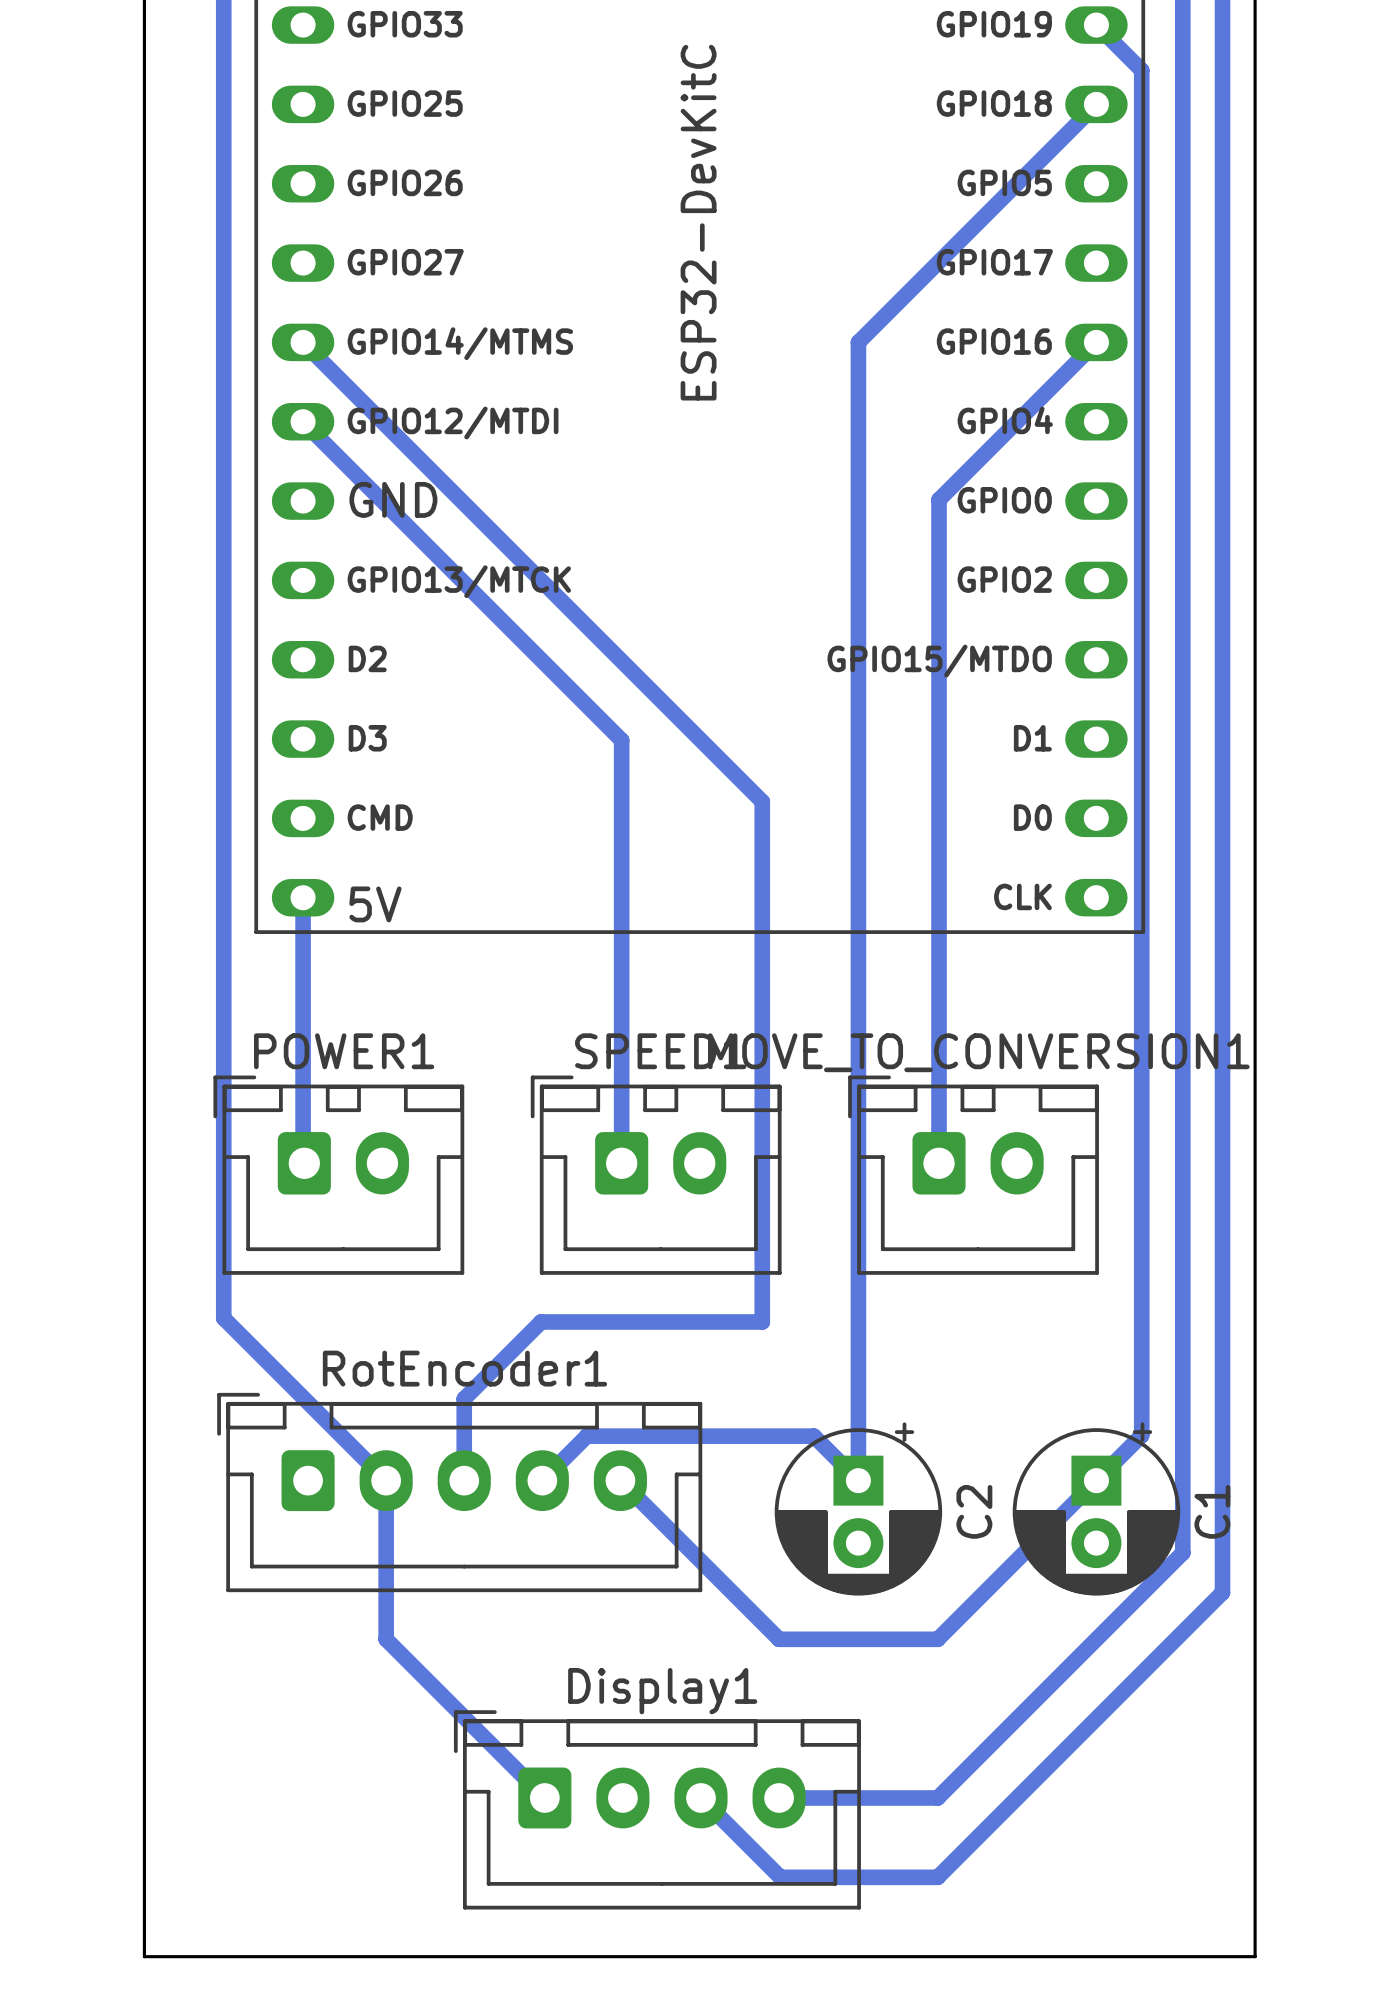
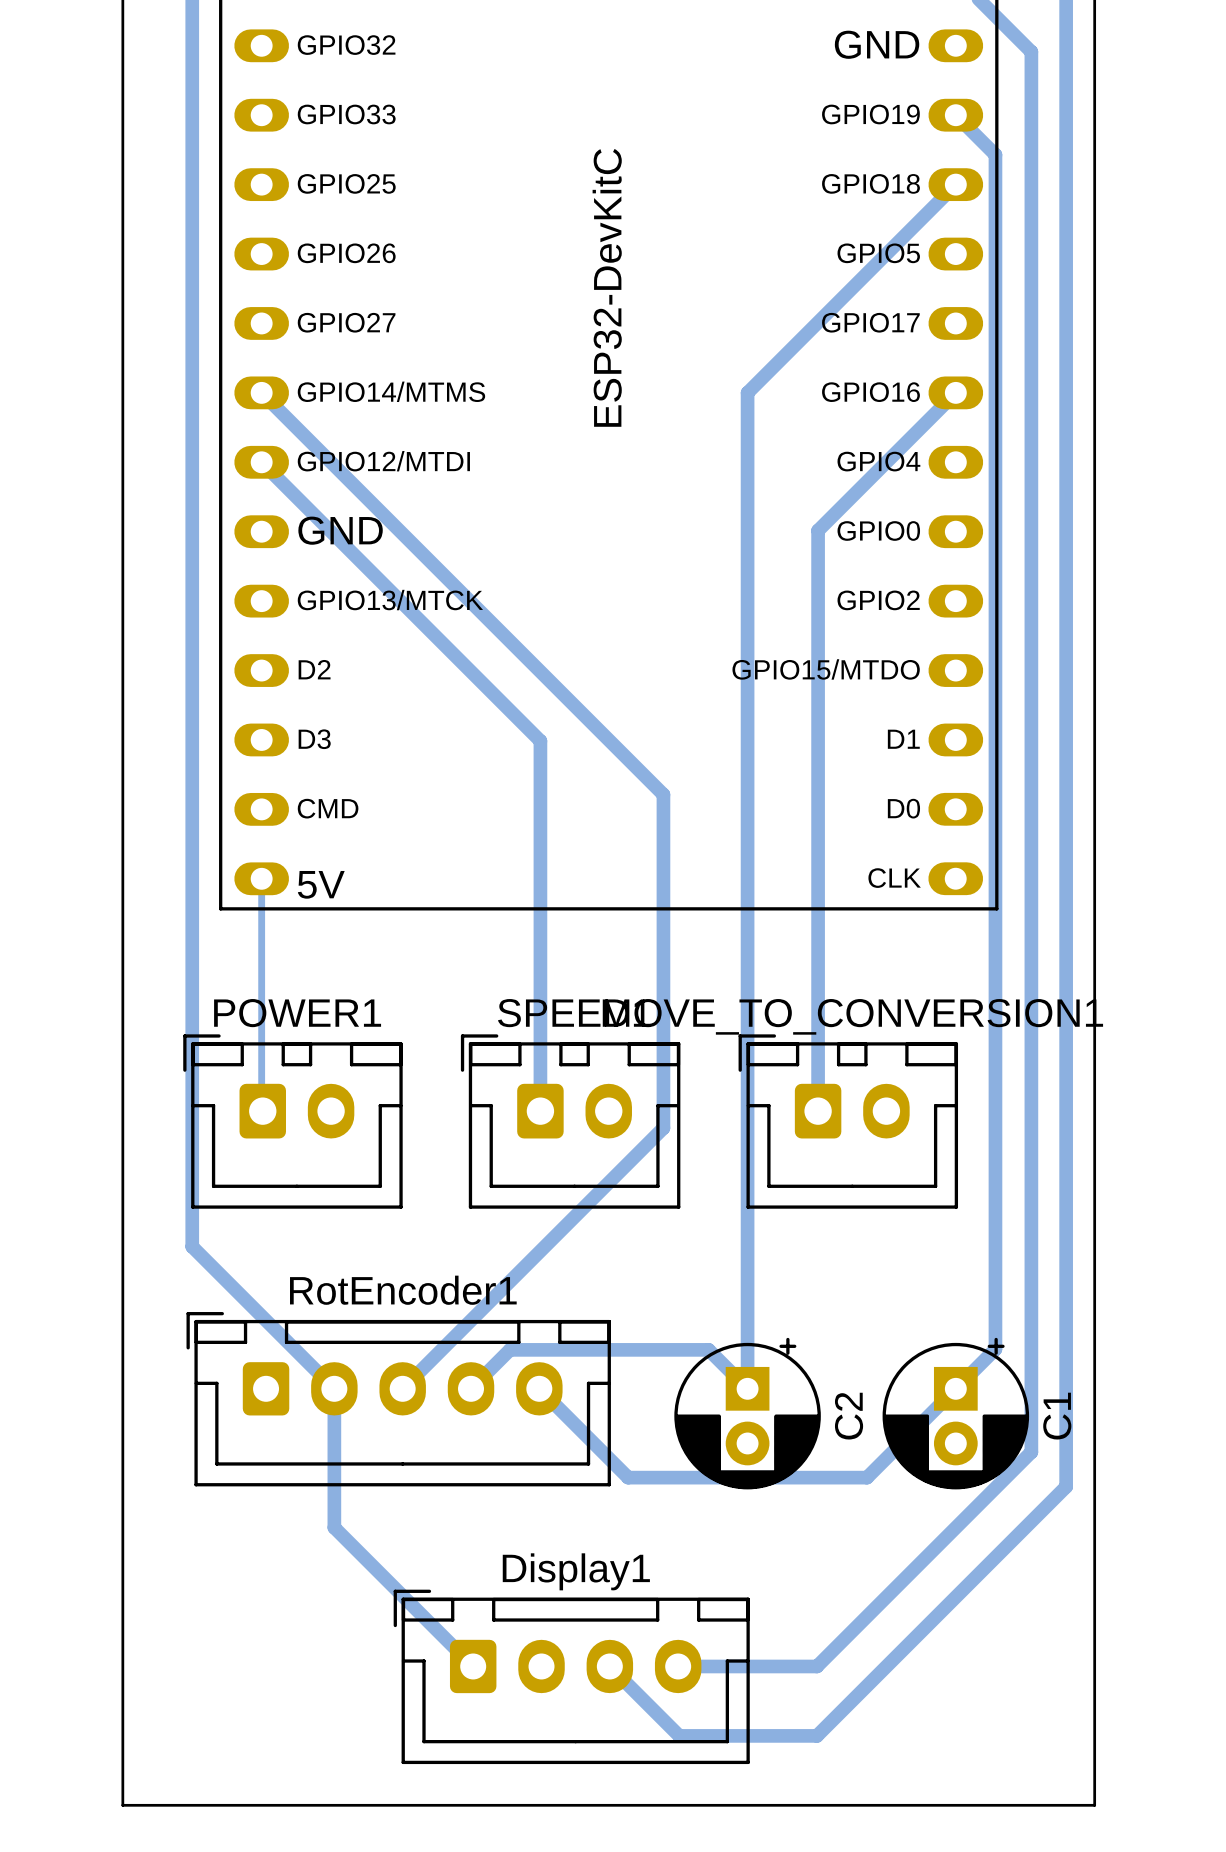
bottom track width: thick (303, 897) (303, 1162) -> thin (261, 878) (261, 1110)
bottom track: (762, 1182) (762, 1321) (541, 1321) (464, 1398) (464, 1480) -> (663, 1128) (402, 1388)
bottom track: (721, 1582) (779, 1639) (937, 1639) (994, 1582) -> (628, 1477) (867, 1477)

